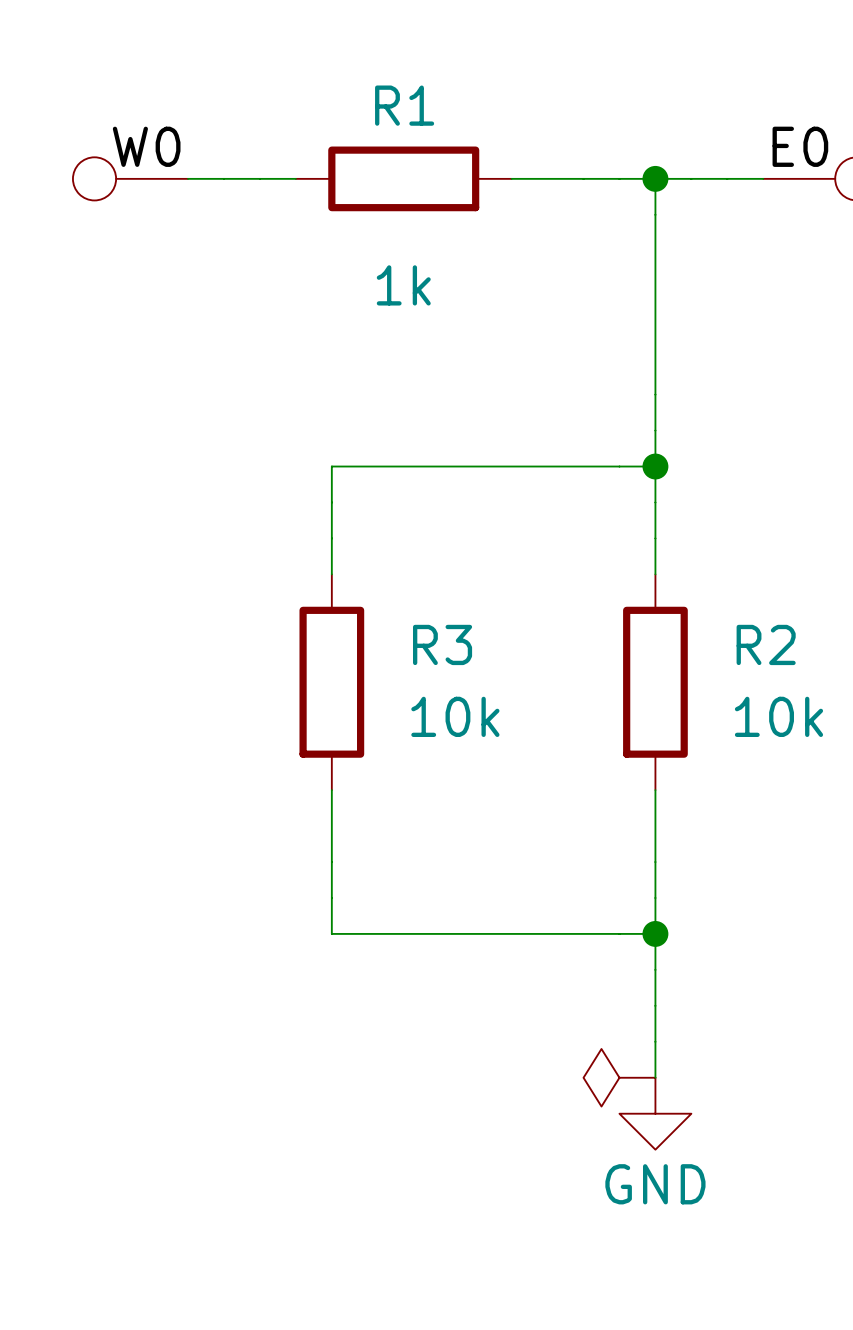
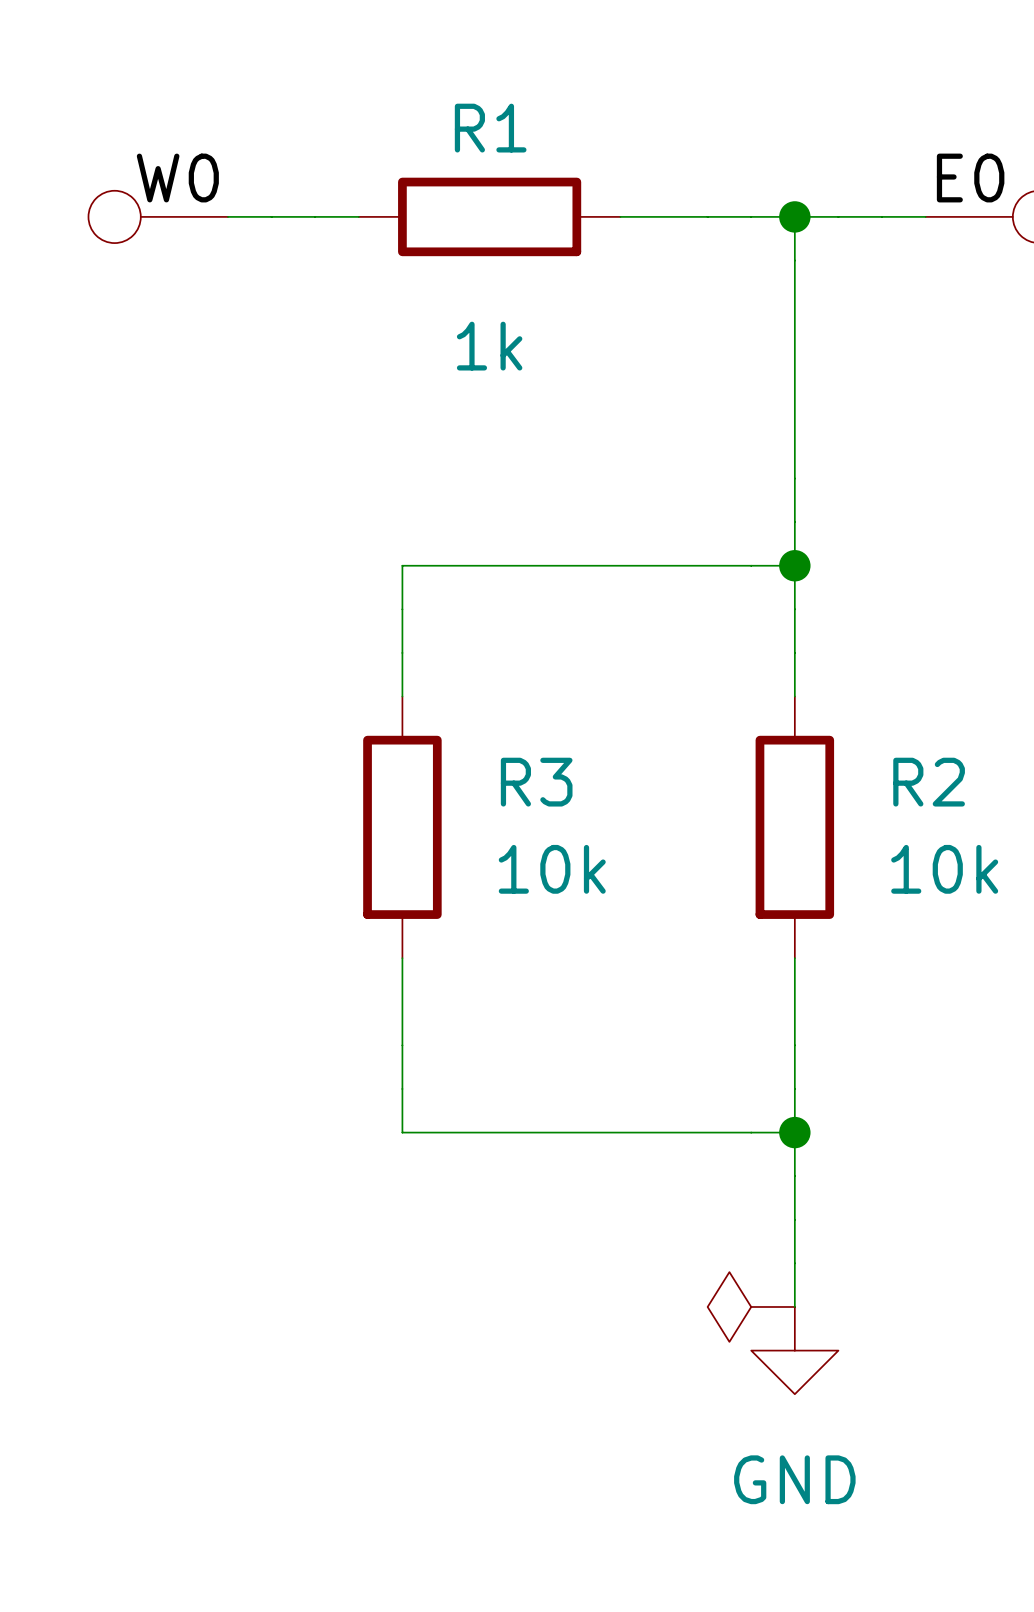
power symbol text position: GND (655, 1184) -> GND (794, 1479)

